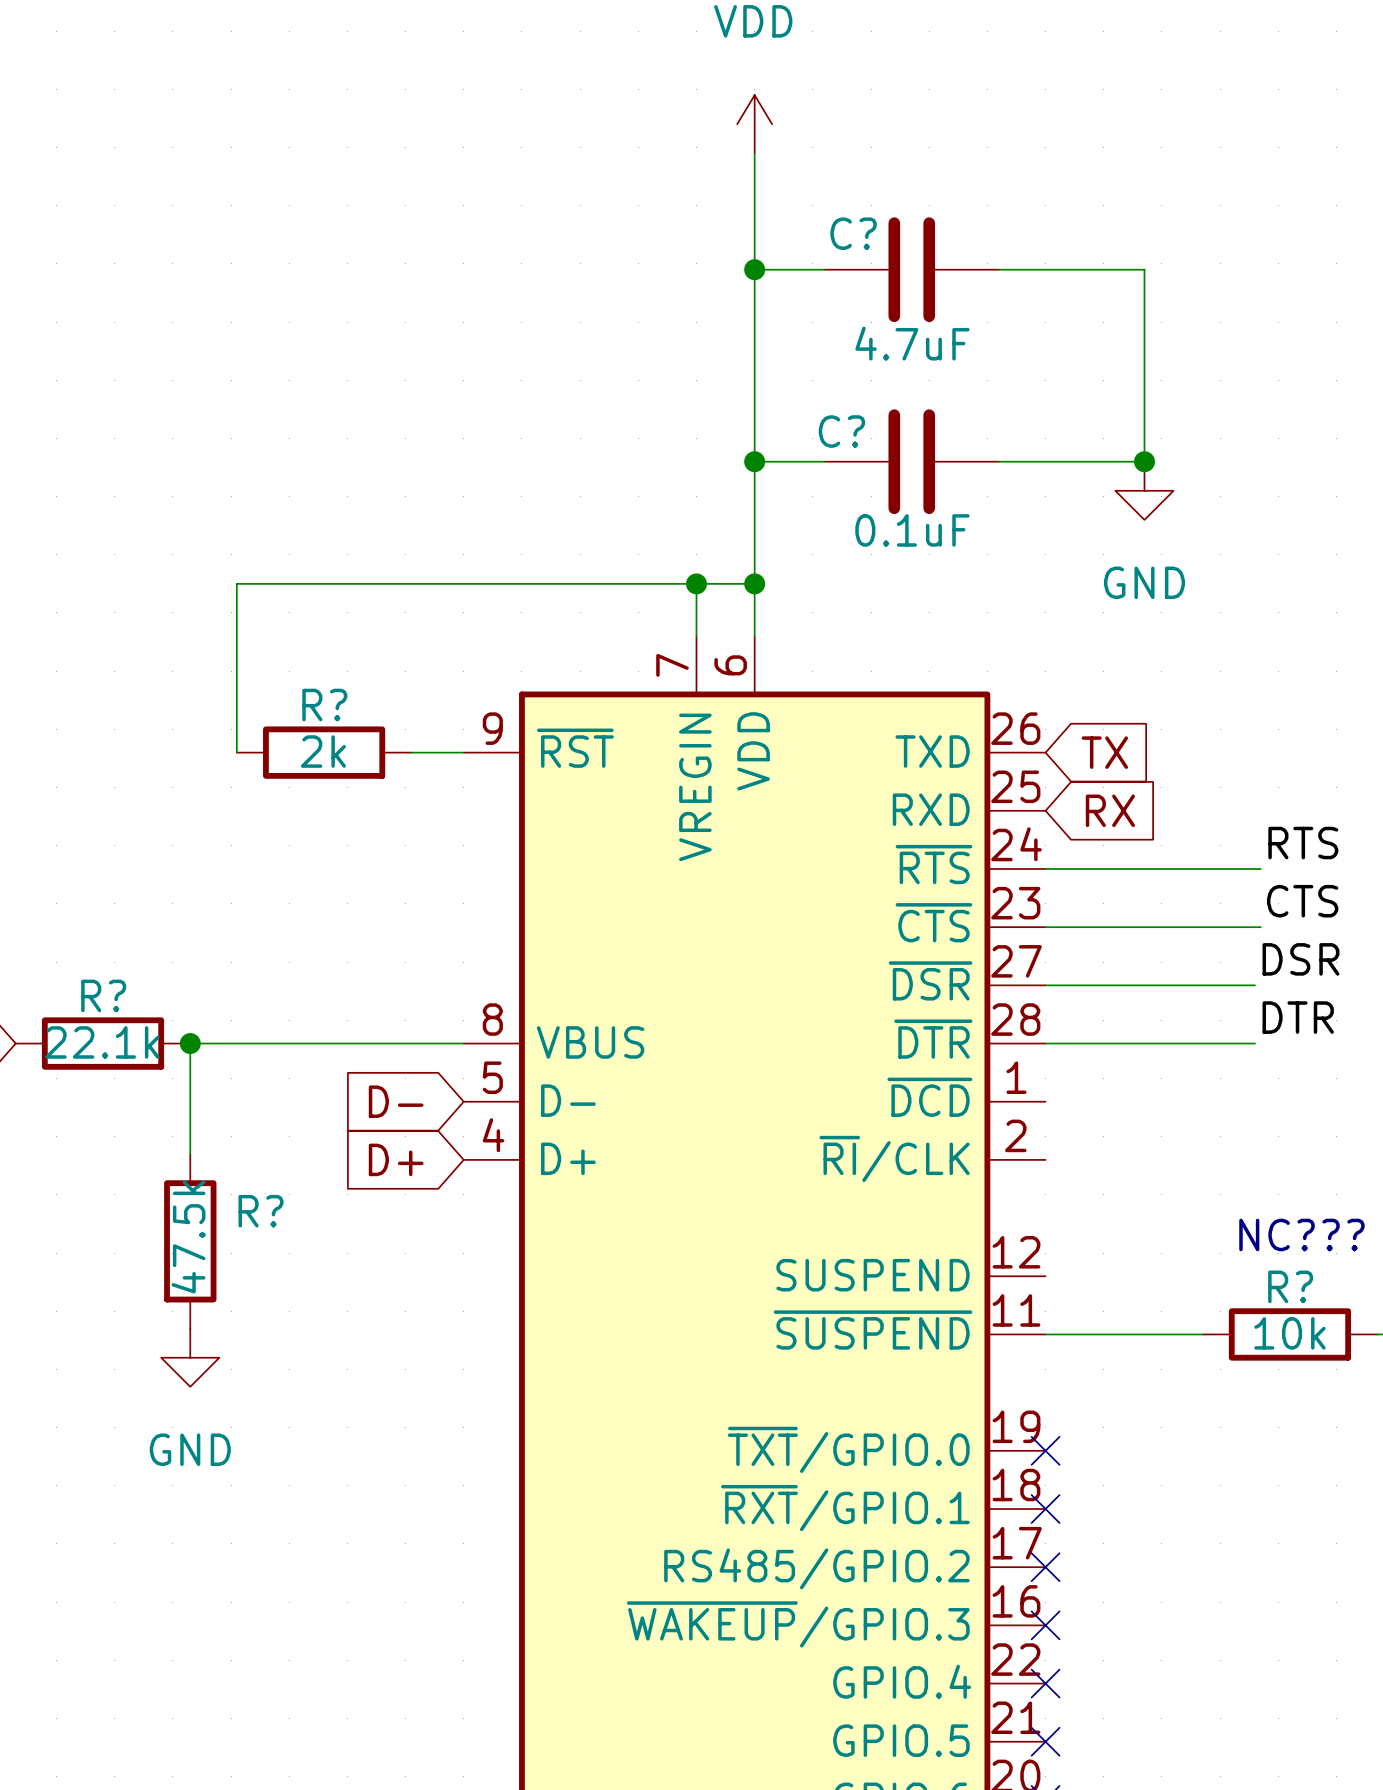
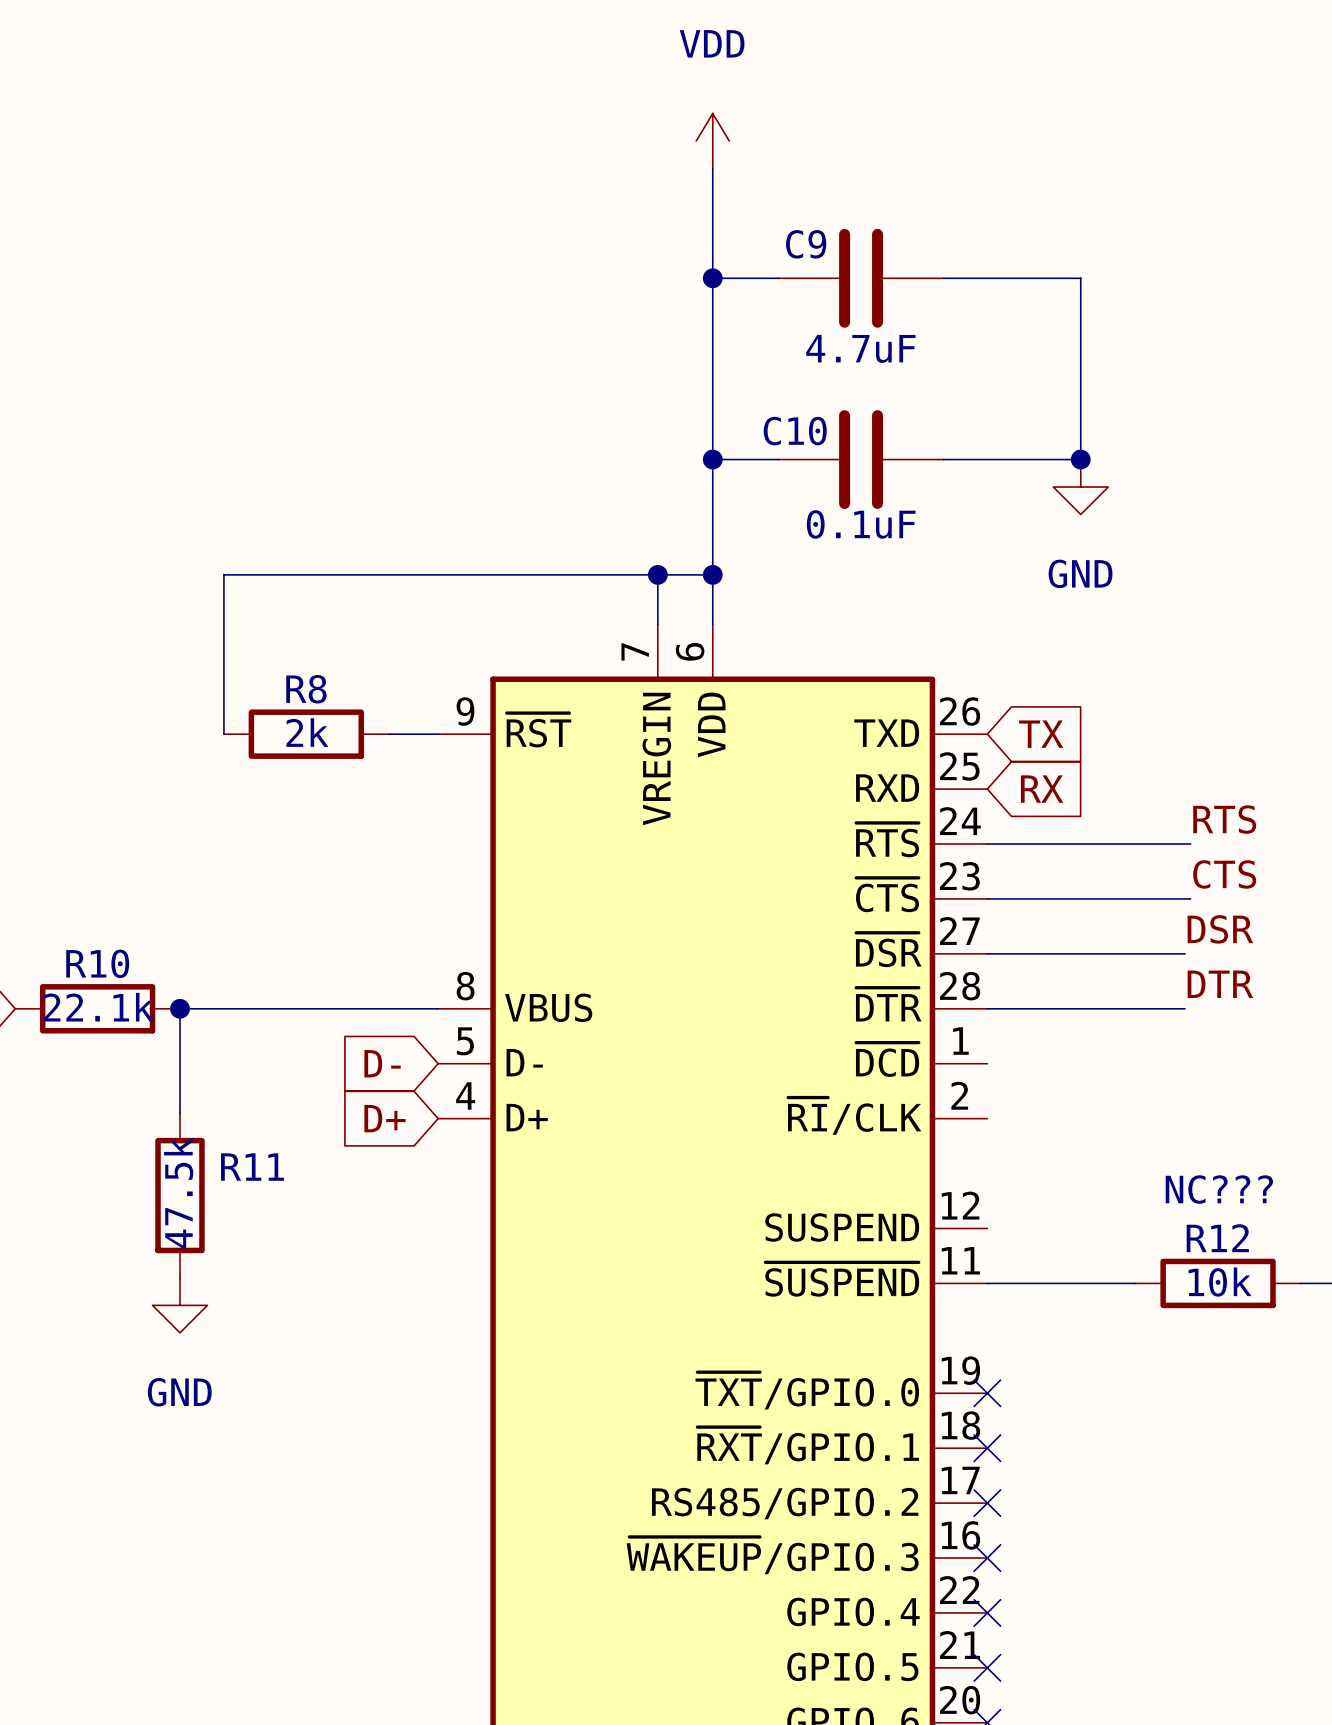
C? name: C? (853, 233) -> C9 (806, 244)
C? name: C? (841, 431) -> C10 (795, 431)
R? name: R? (324, 704) -> R8 (306, 689)
R? name: R? (103, 995) -> R10 (97, 963)
R? name: R? (261, 1211) -> R11 (252, 1167)
R? name: R? (1290, 1286) -> R12 (1217, 1238)

